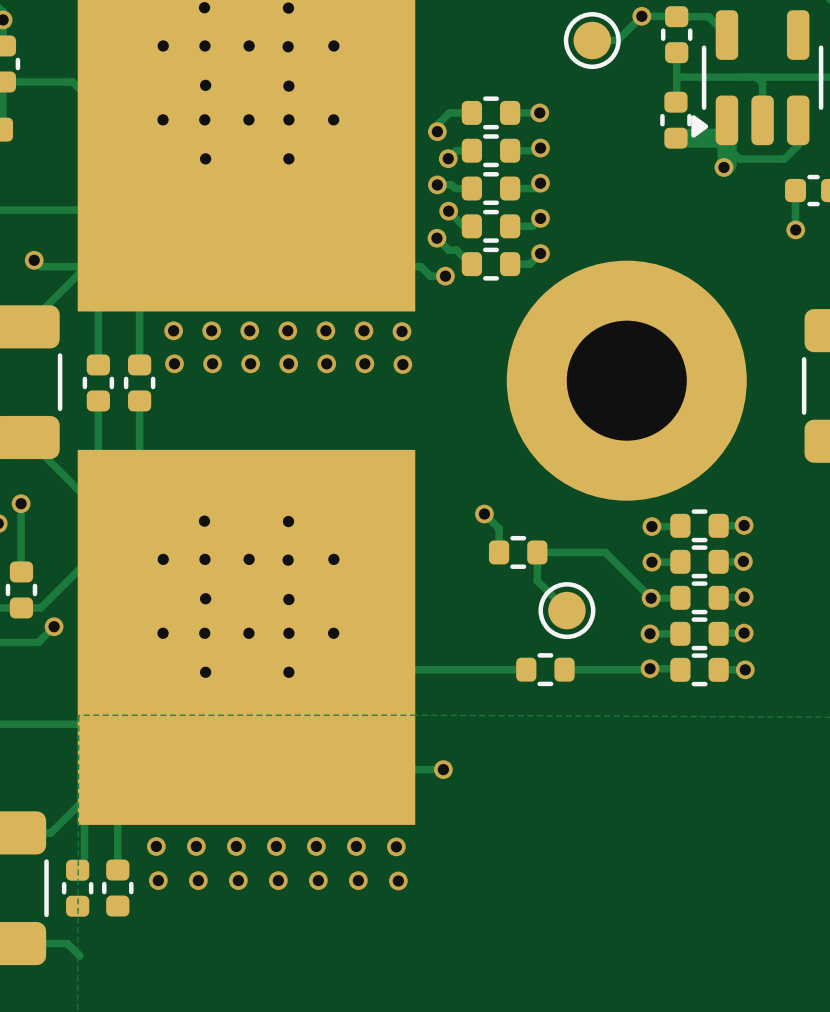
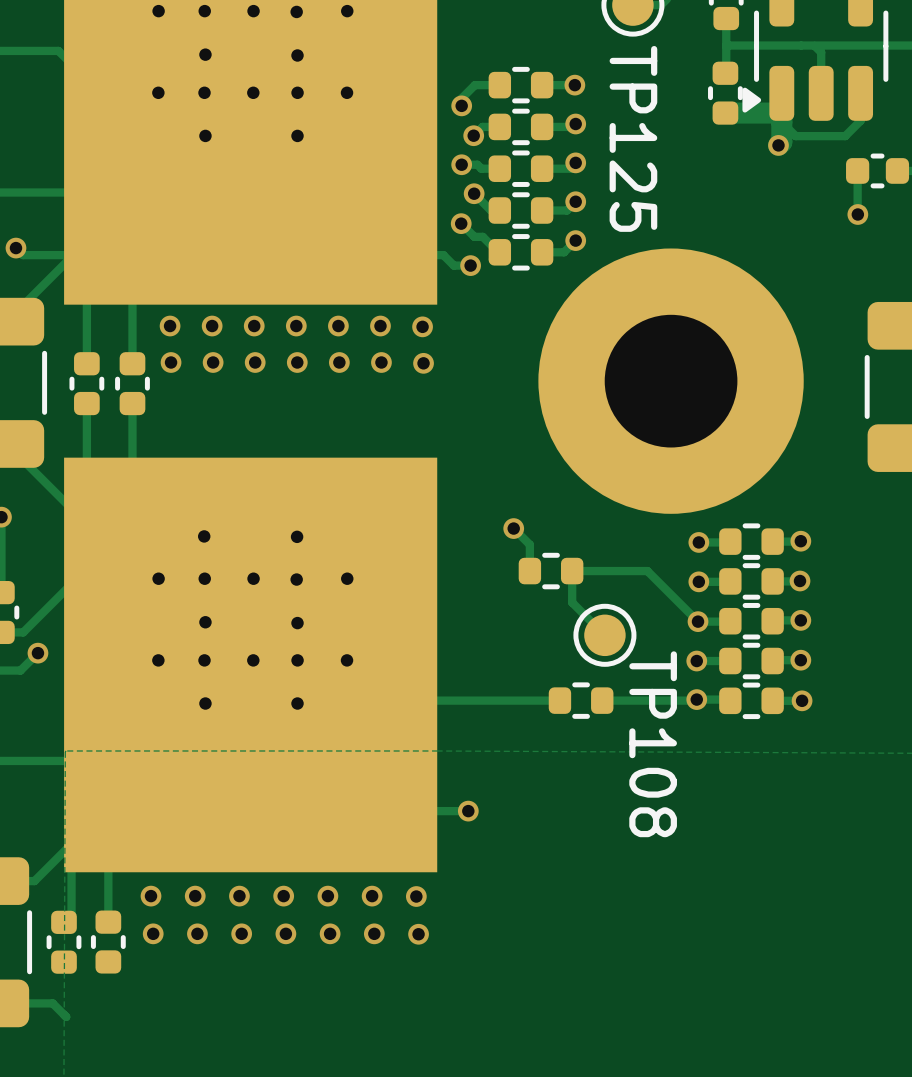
TP125 name: none -> TP125 (633, 138)
TP108 name: none -> TP108 (653, 744)

